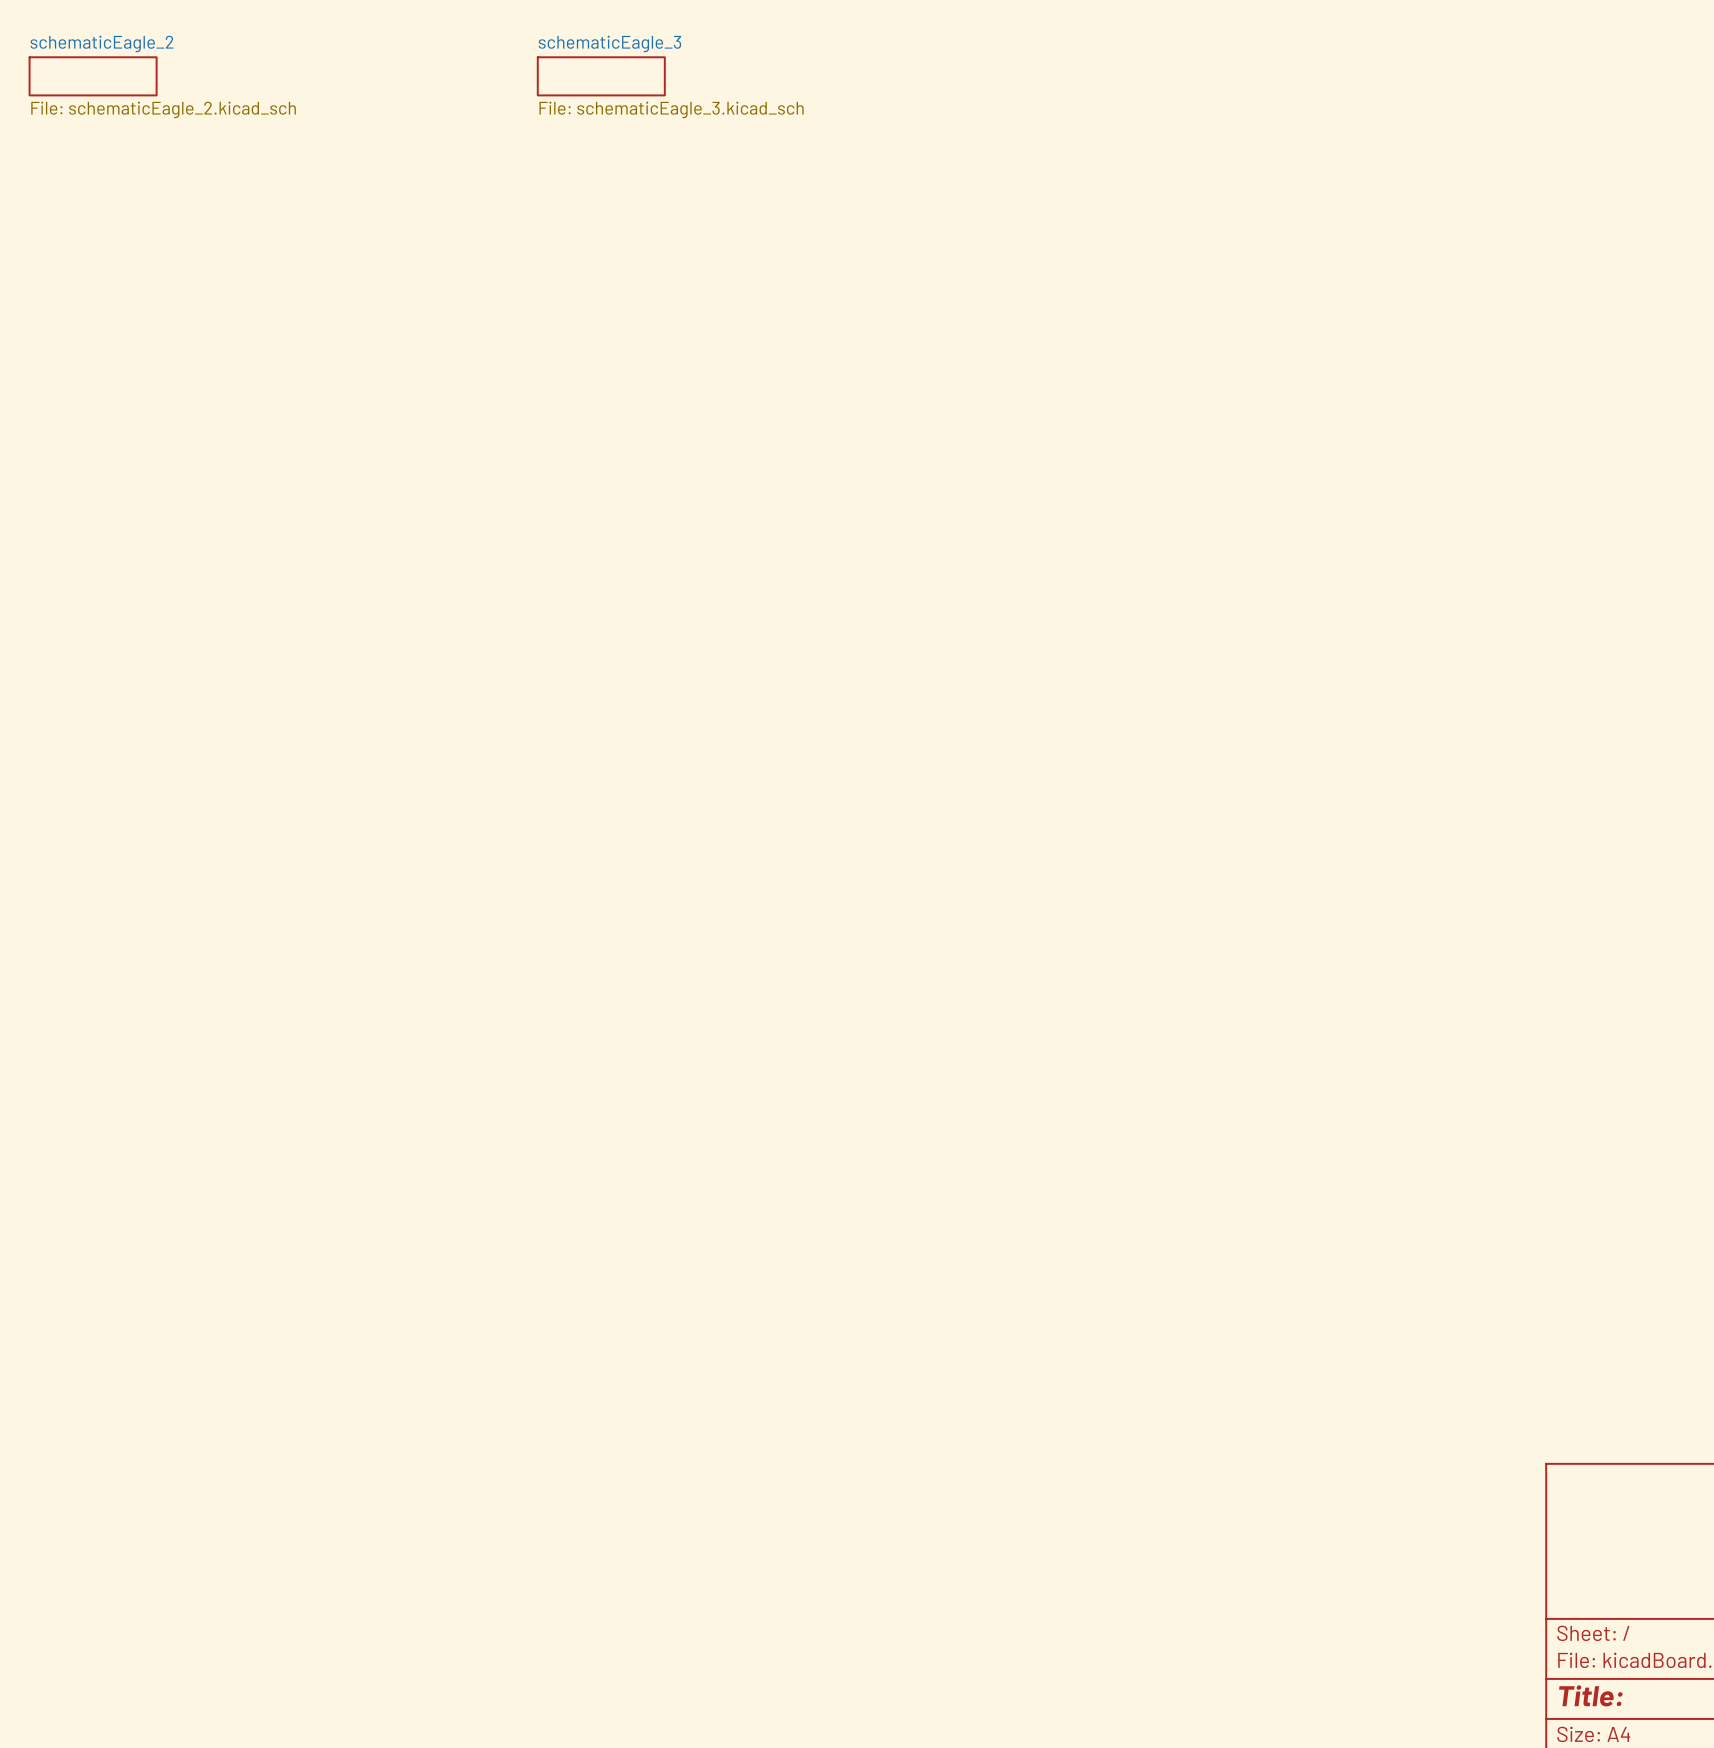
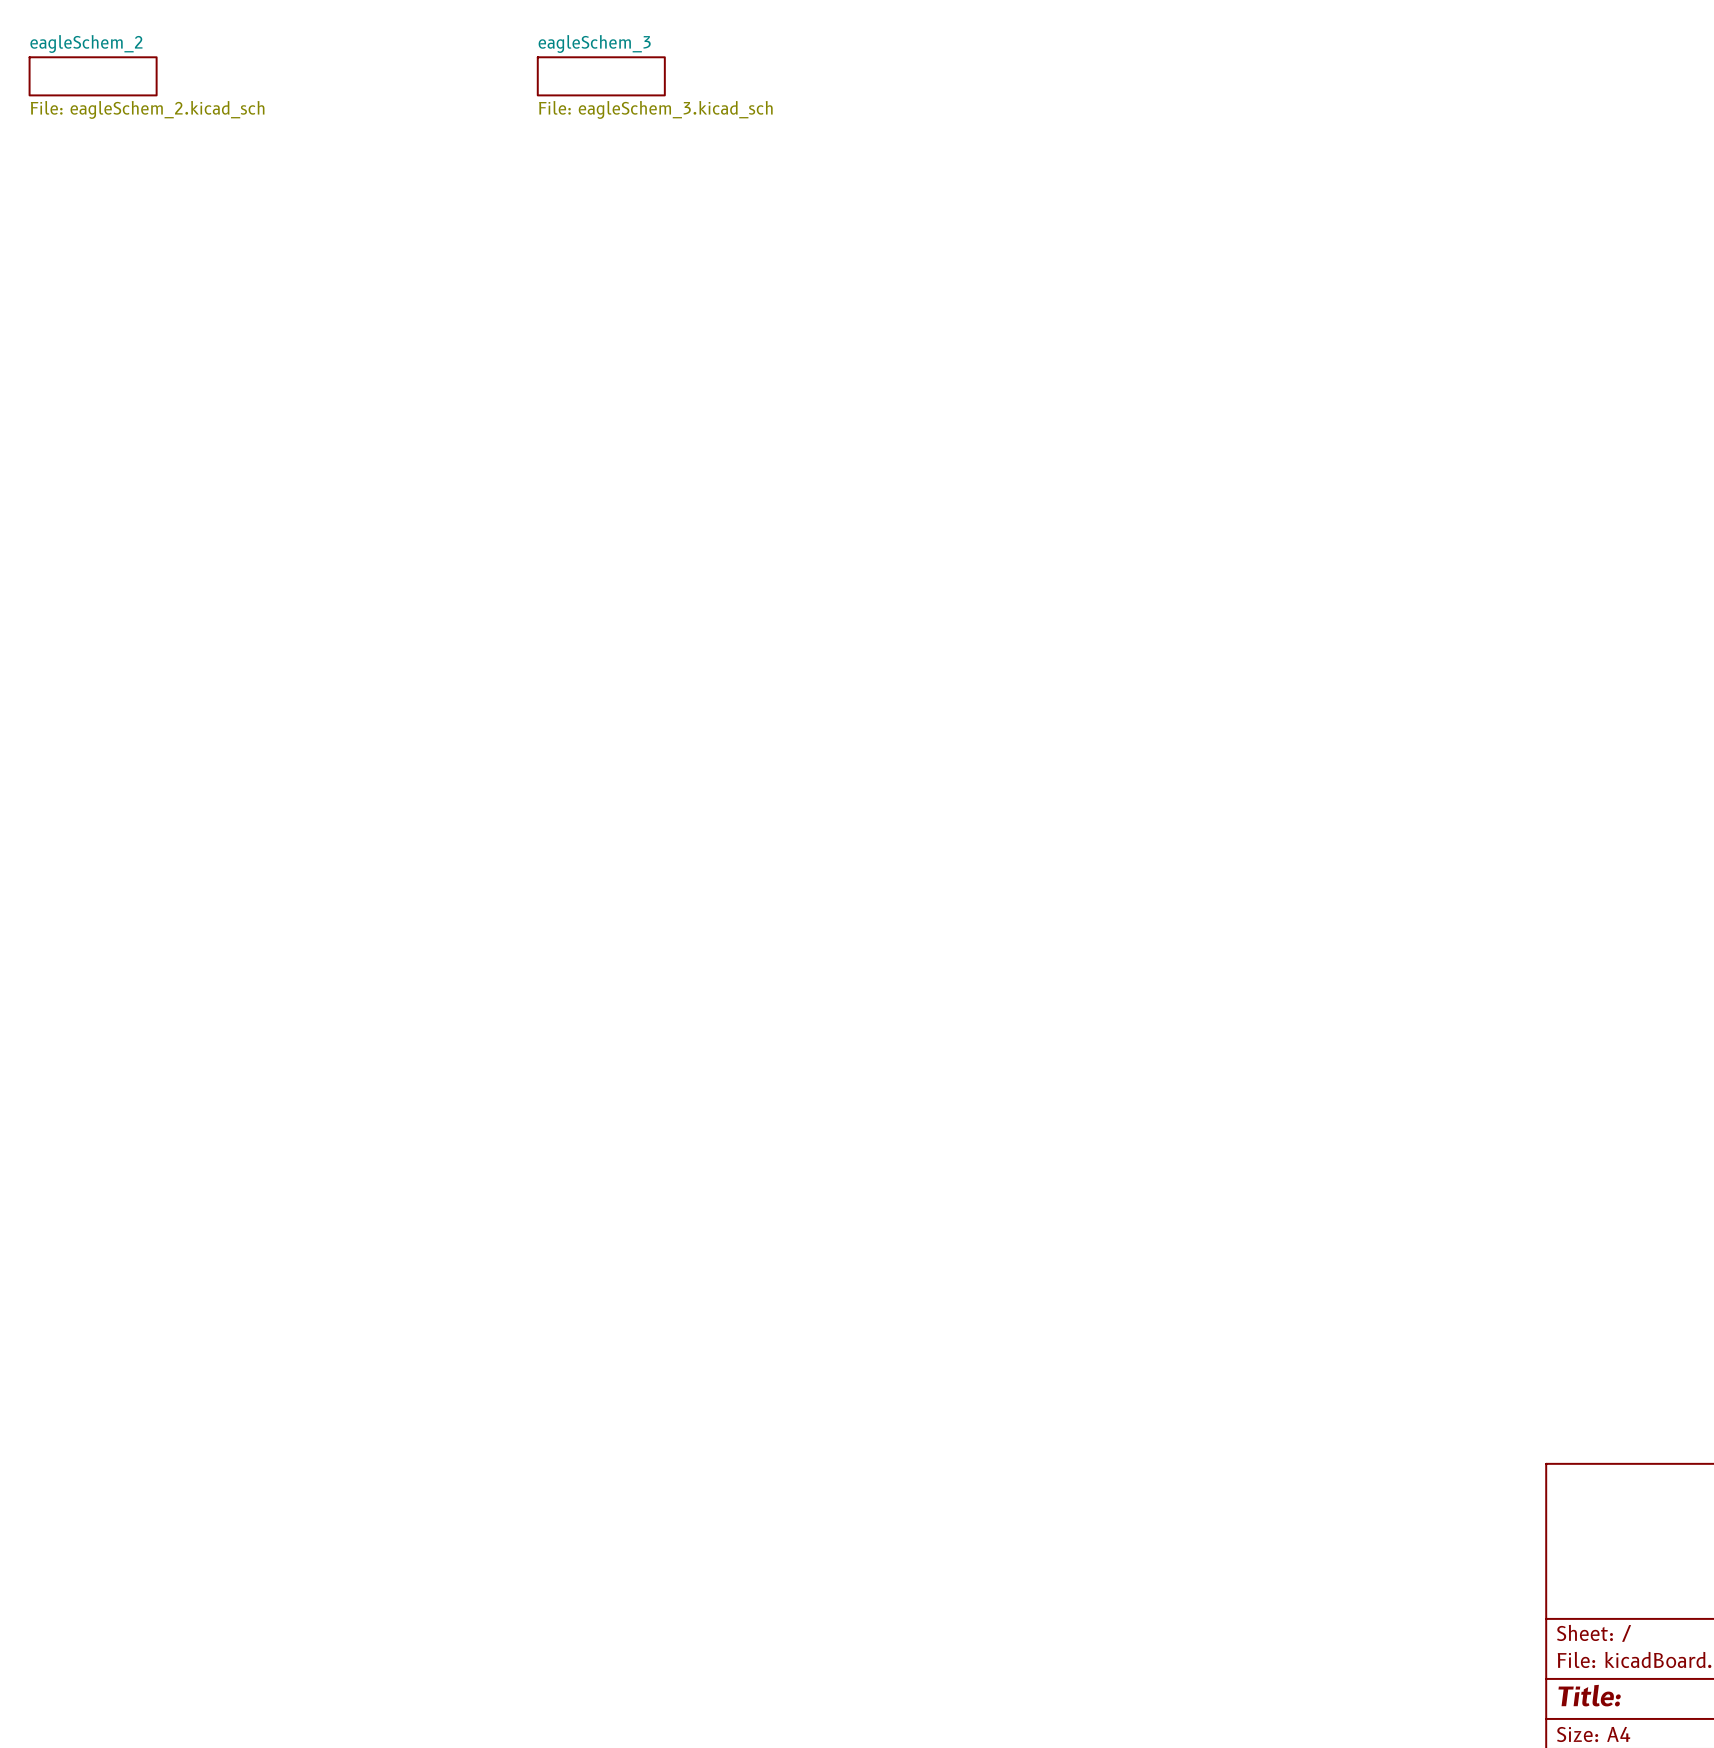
sheet schematicEagle_2 name: schematicEagle_2 (102, 43) -> eagleSchem_2 (86, 43)
sheet schematicEagle_3 name: schematicEagle_3 (609, 43) -> eagleSchem_3 (594, 43)
sheet schematicEagle_2 value: File: schematicEagle_2.kicad_sch (163, 109) -> File: eagleSchem_2.kicad_sch (147, 109)
sheet schematicEagle_3 value: File: schematicEagle_3.kicad_sch (671, 109) -> File: eagleSchem_3.kicad_sch (655, 109)

